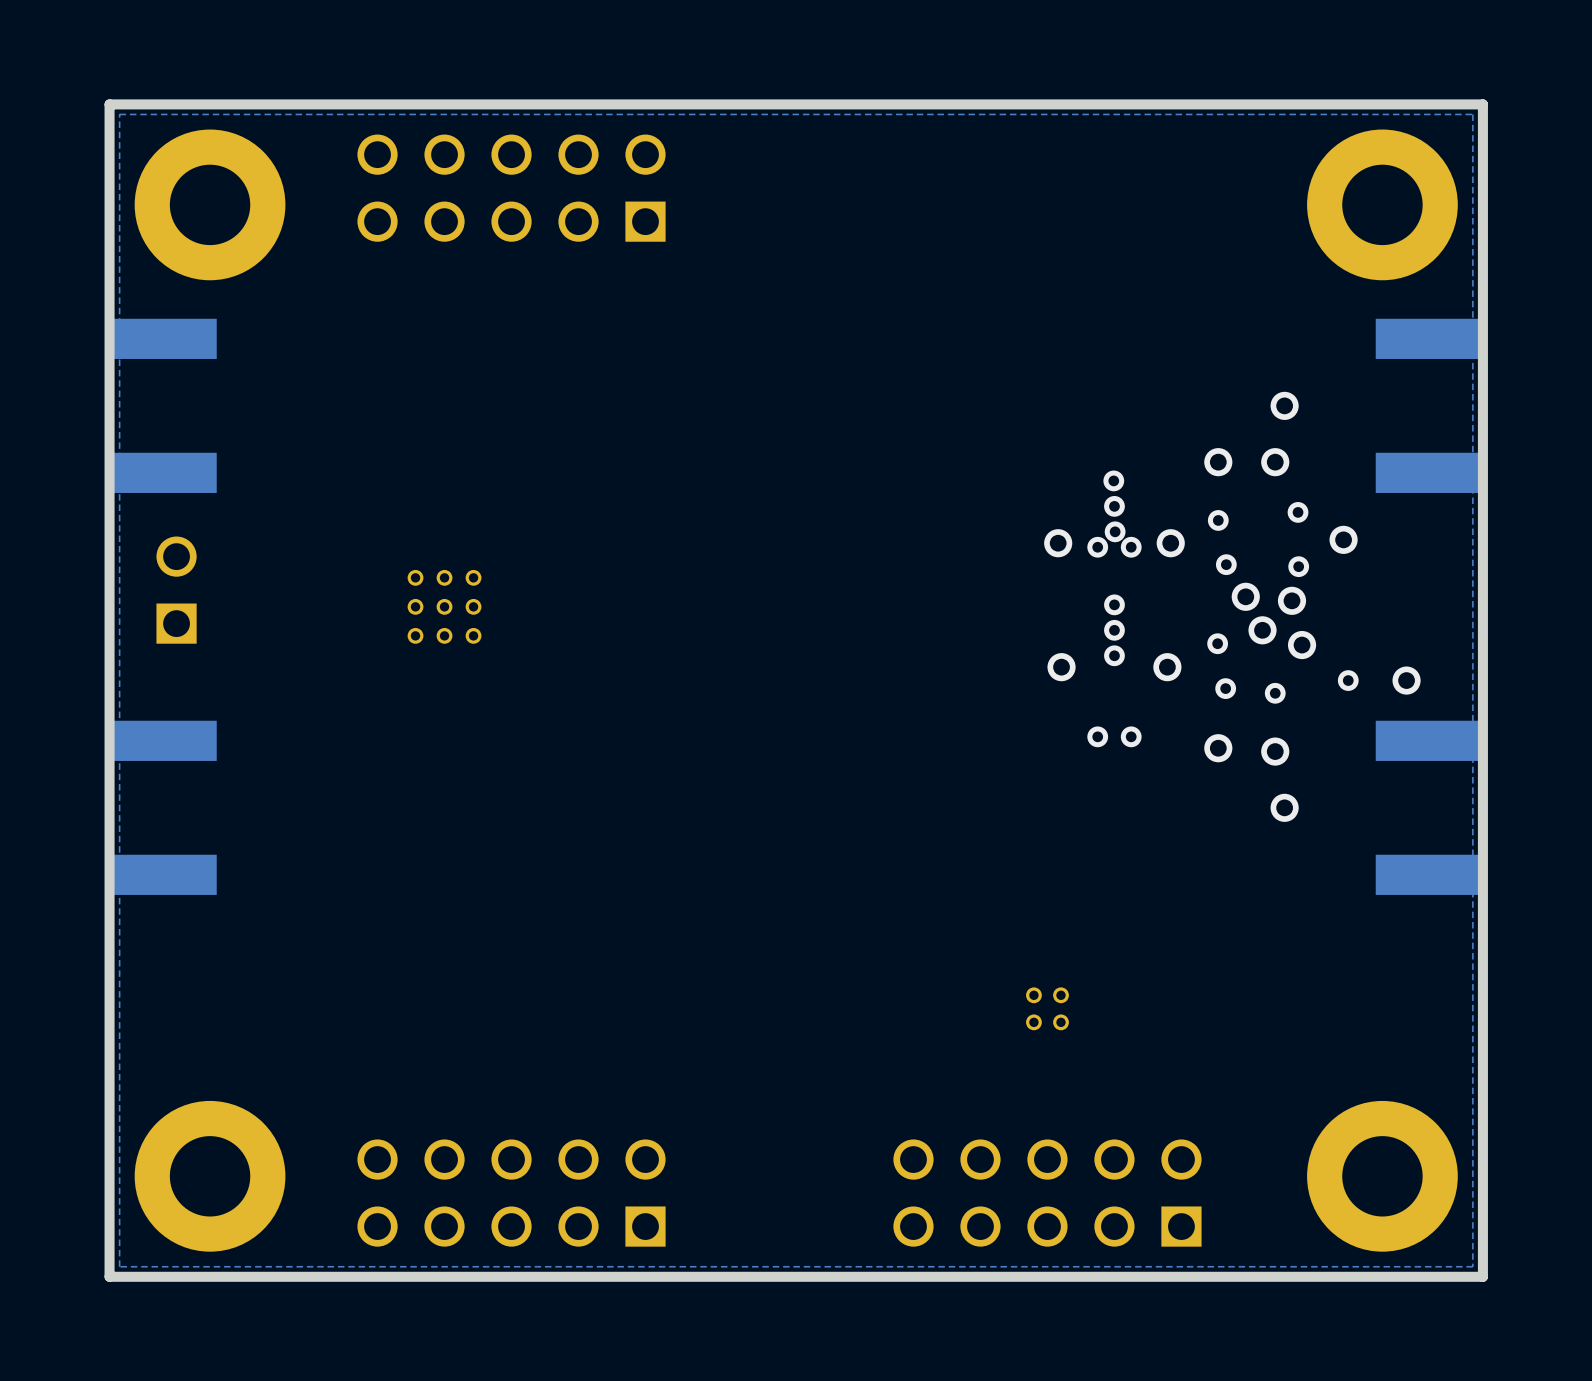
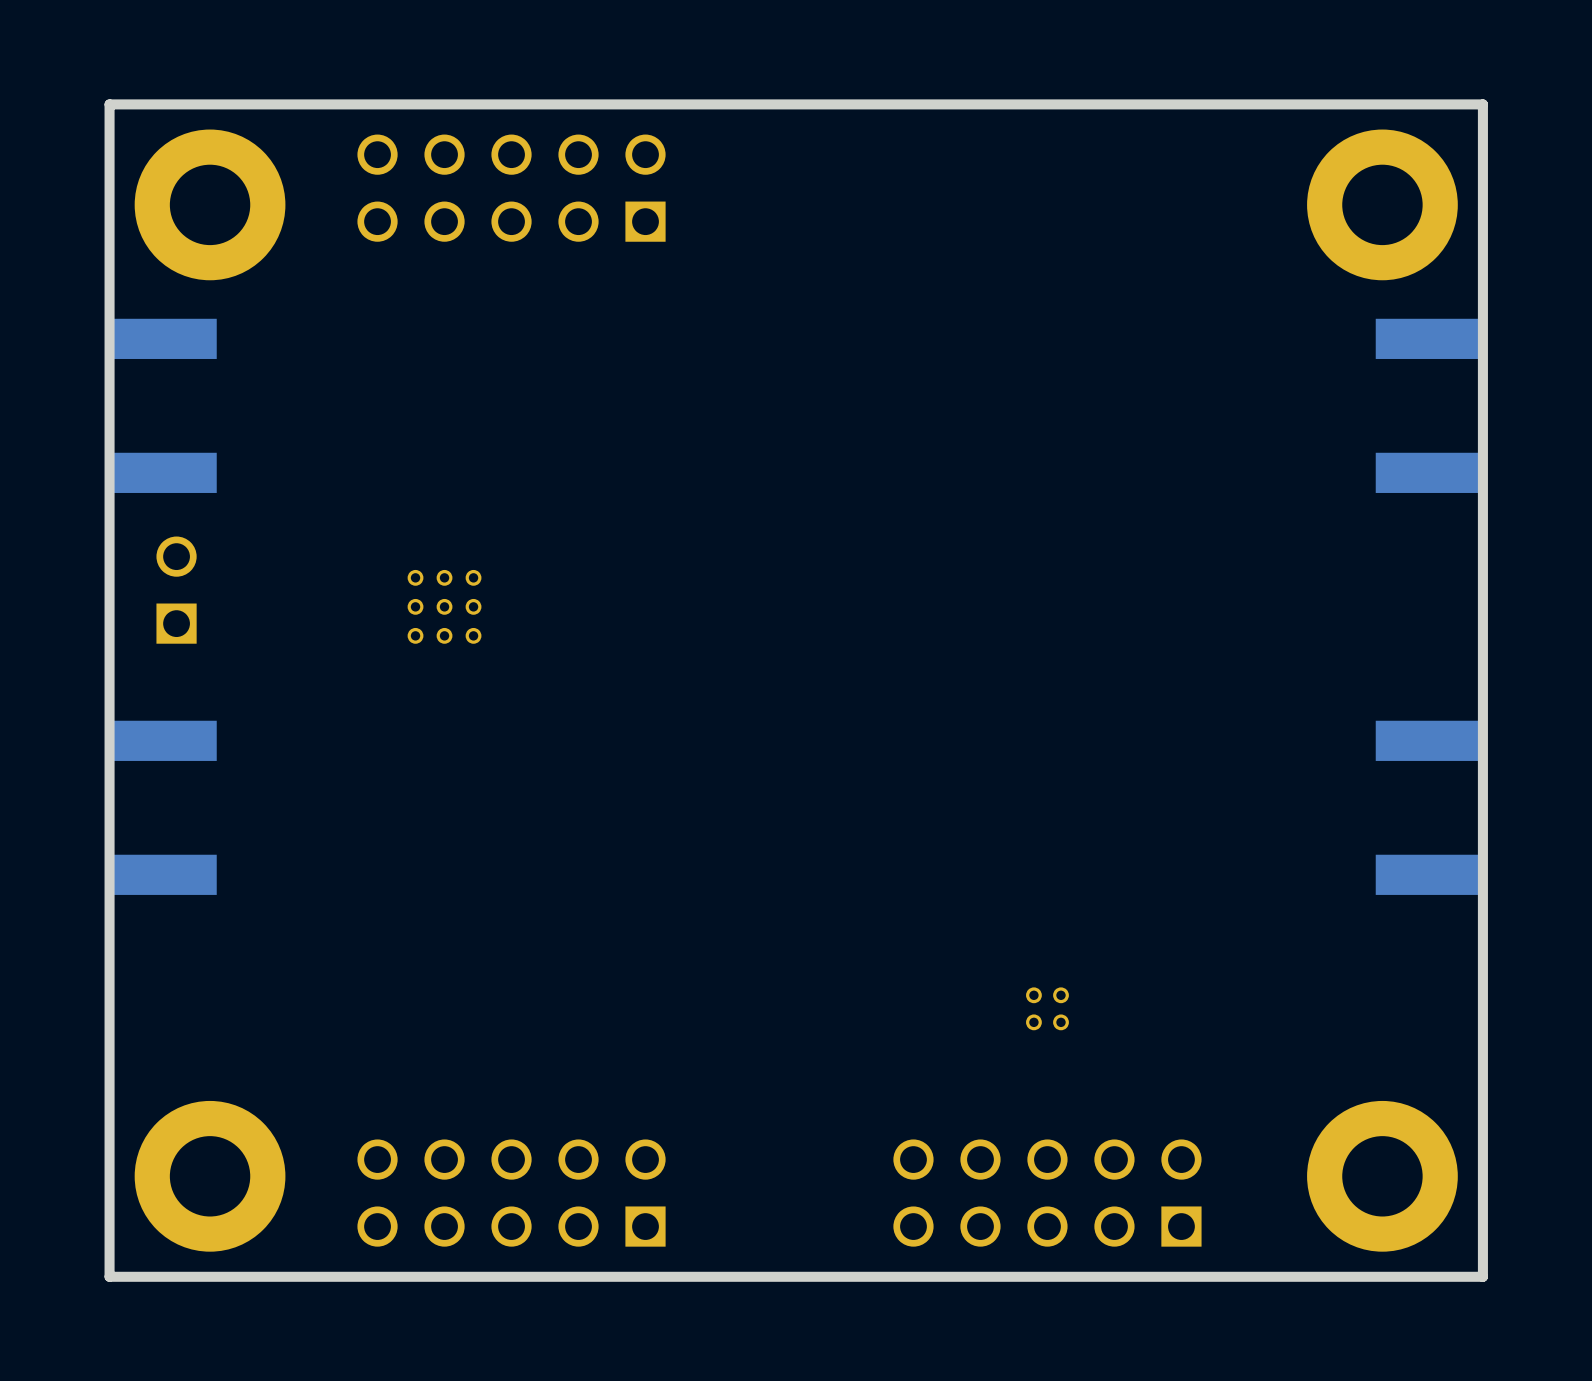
zone outline: (1472, 114) (119, 114) (119, 1266) (1472, 1266) (1472, 114) -> none
via: (1284, 405) -> none
via: (1218, 462) -> none
via: (1275, 462) -> none
via: (1113, 480) -> none
via: (1114, 506) -> none
via: (1298, 512) -> none
via: (1218, 520) -> none
via: (1115, 531) -> none
via: (1343, 539) -> none
via: (1058, 543) -> none
via: (1170, 543) -> none
via: (1097, 547) -> none
via: (1131, 547) -> none
via: (1226, 564) -> none
via: (1298, 566) -> none
via: (1245, 596) -> none
via: (1292, 600) -> none
via: (1114, 604) -> none
via: (1114, 630) -> none
via: (1262, 630) -> none
via: (1217, 643) -> none
via: (1302, 645) -> none
via: (1114, 655) -> none
via: (1061, 667) -> none
via: (1167, 667) -> none
via: (1348, 680) -> none
via: (1406, 680) -> none
via: (1225, 688) -> none
via: (1275, 693) -> none
via: (1097, 736) -> none
via: (1131, 736) -> none
via: (1218, 748) -> none
via: (1275, 751) -> none
via: (1284, 807) -> none

